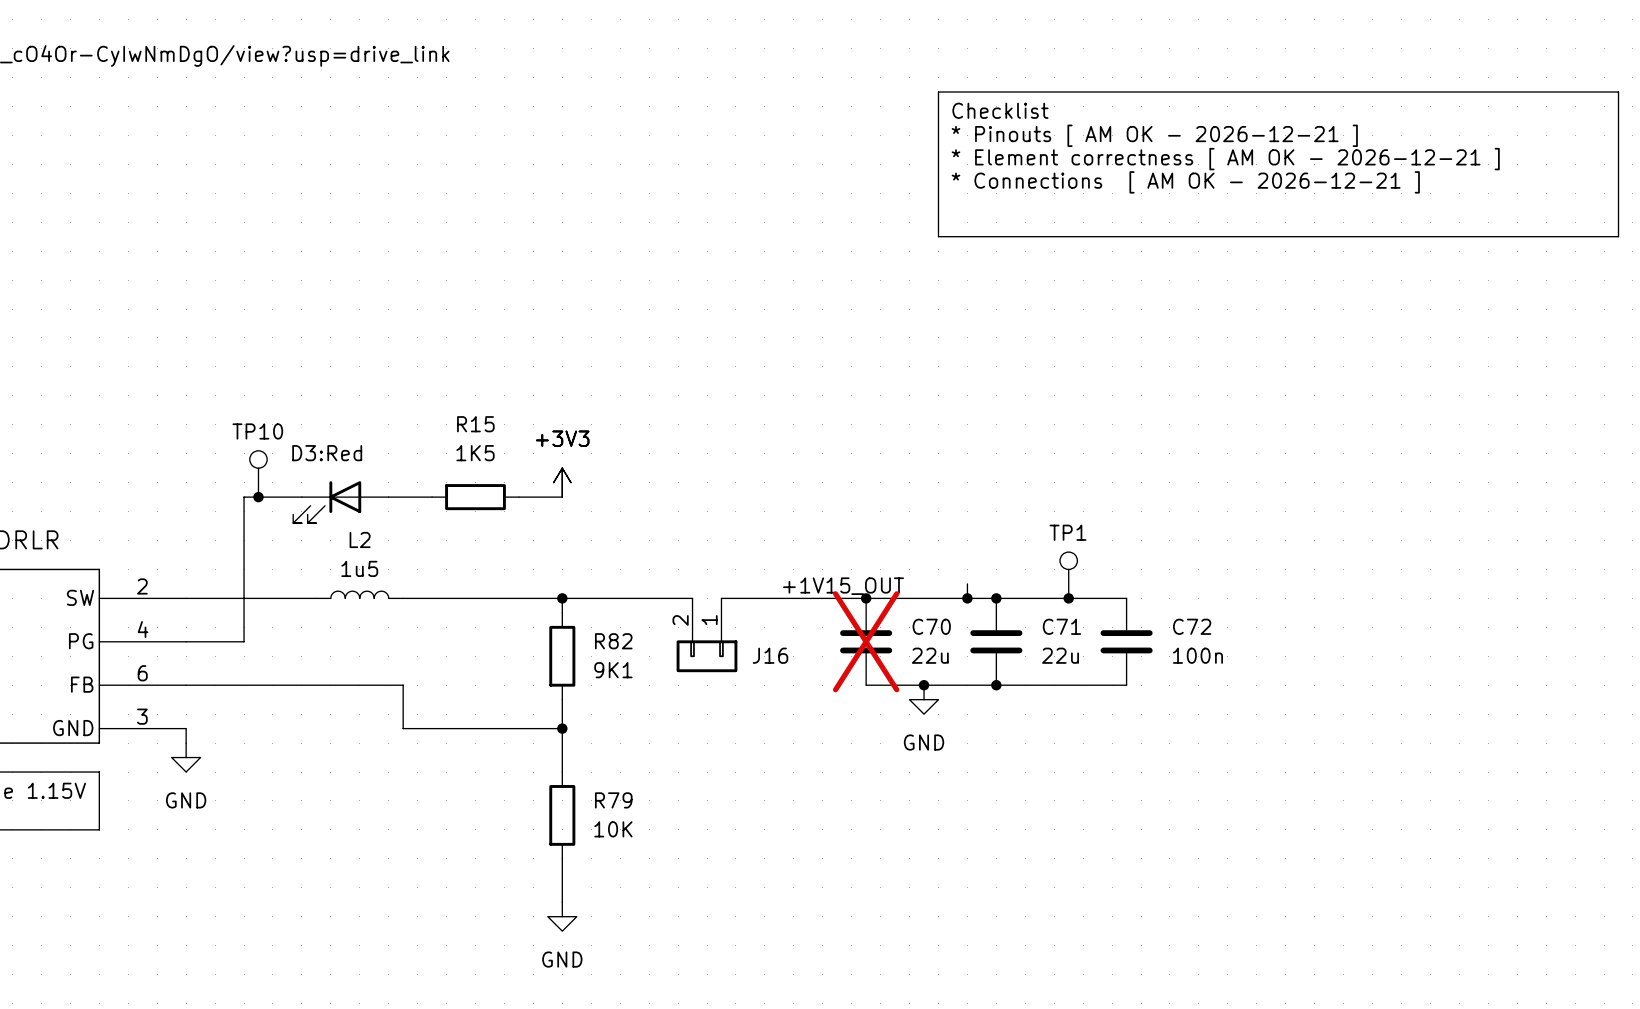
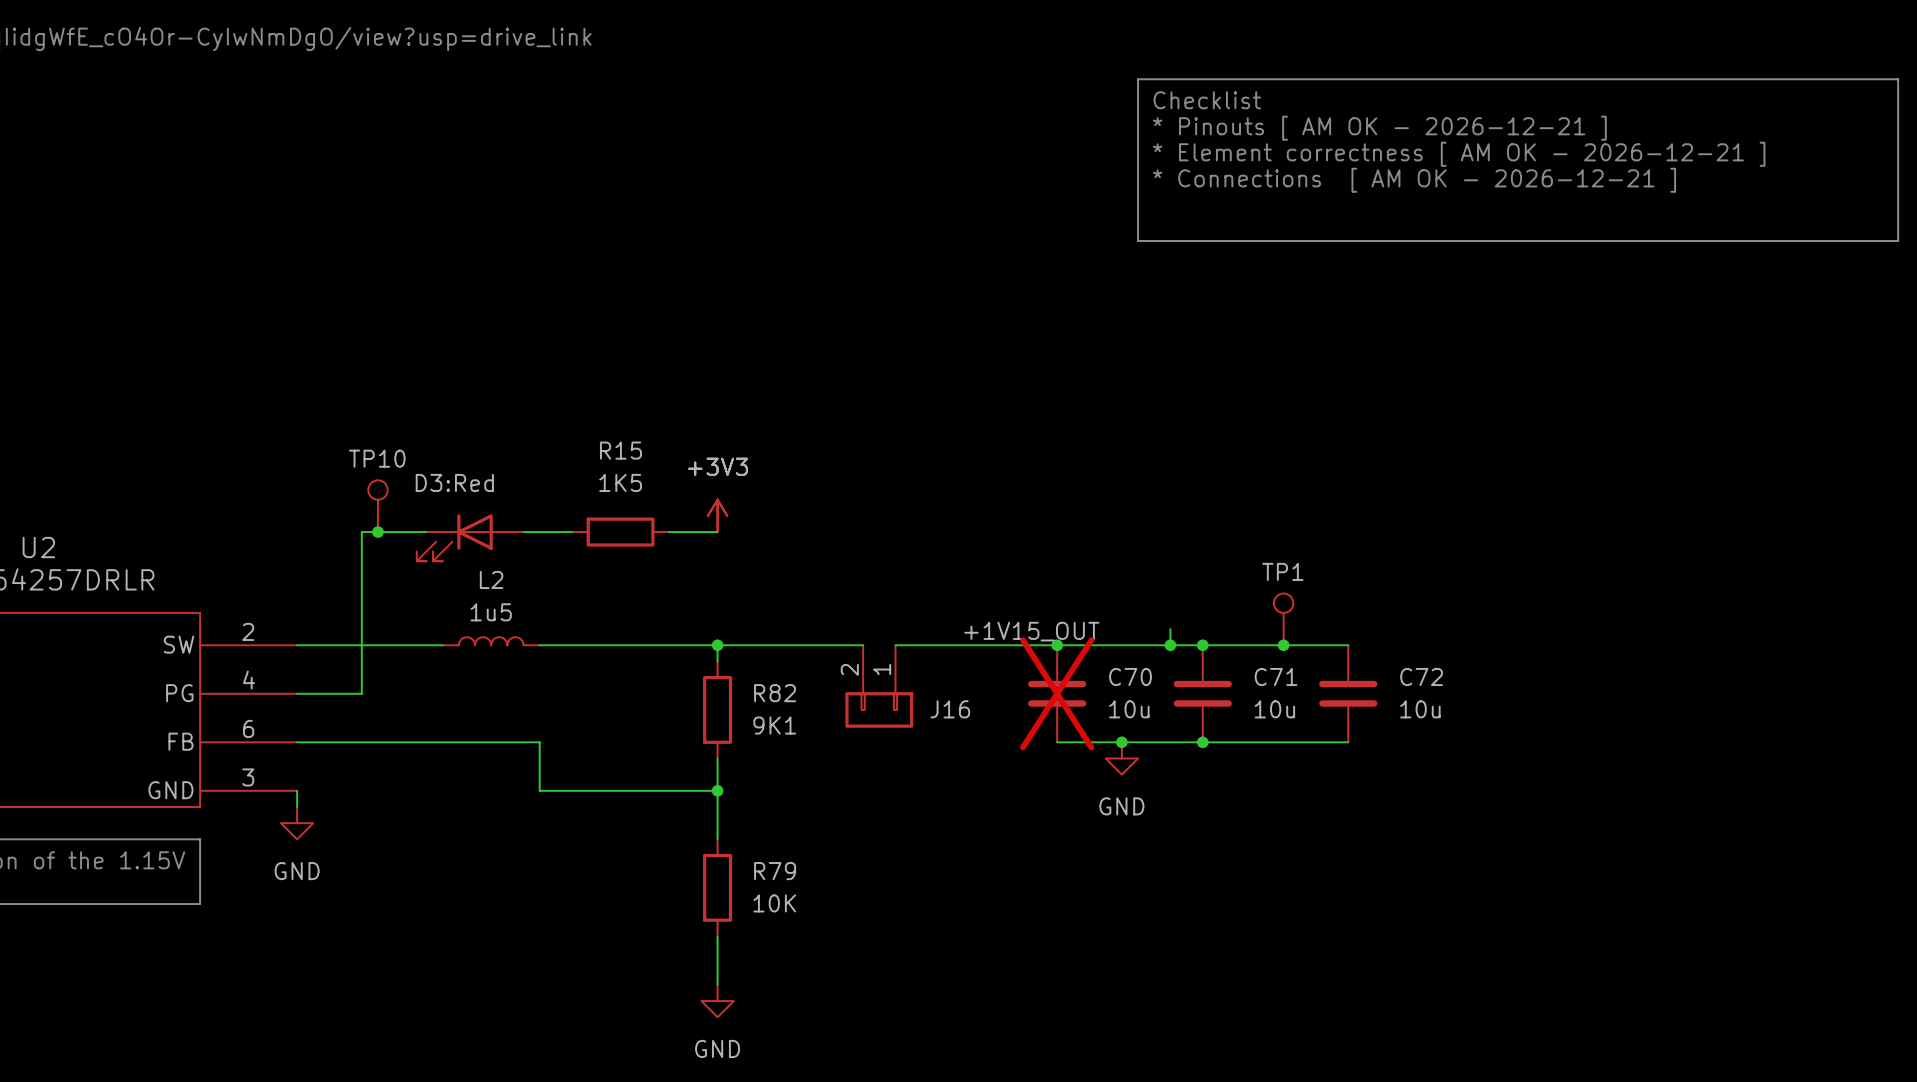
C70 value: 22u (930, 655) -> 10u (1129, 709)
C71 value: 22u (1060, 655) -> 10u (1274, 709)
C72 value: 100n (1197, 655) -> 10u (1420, 709)

